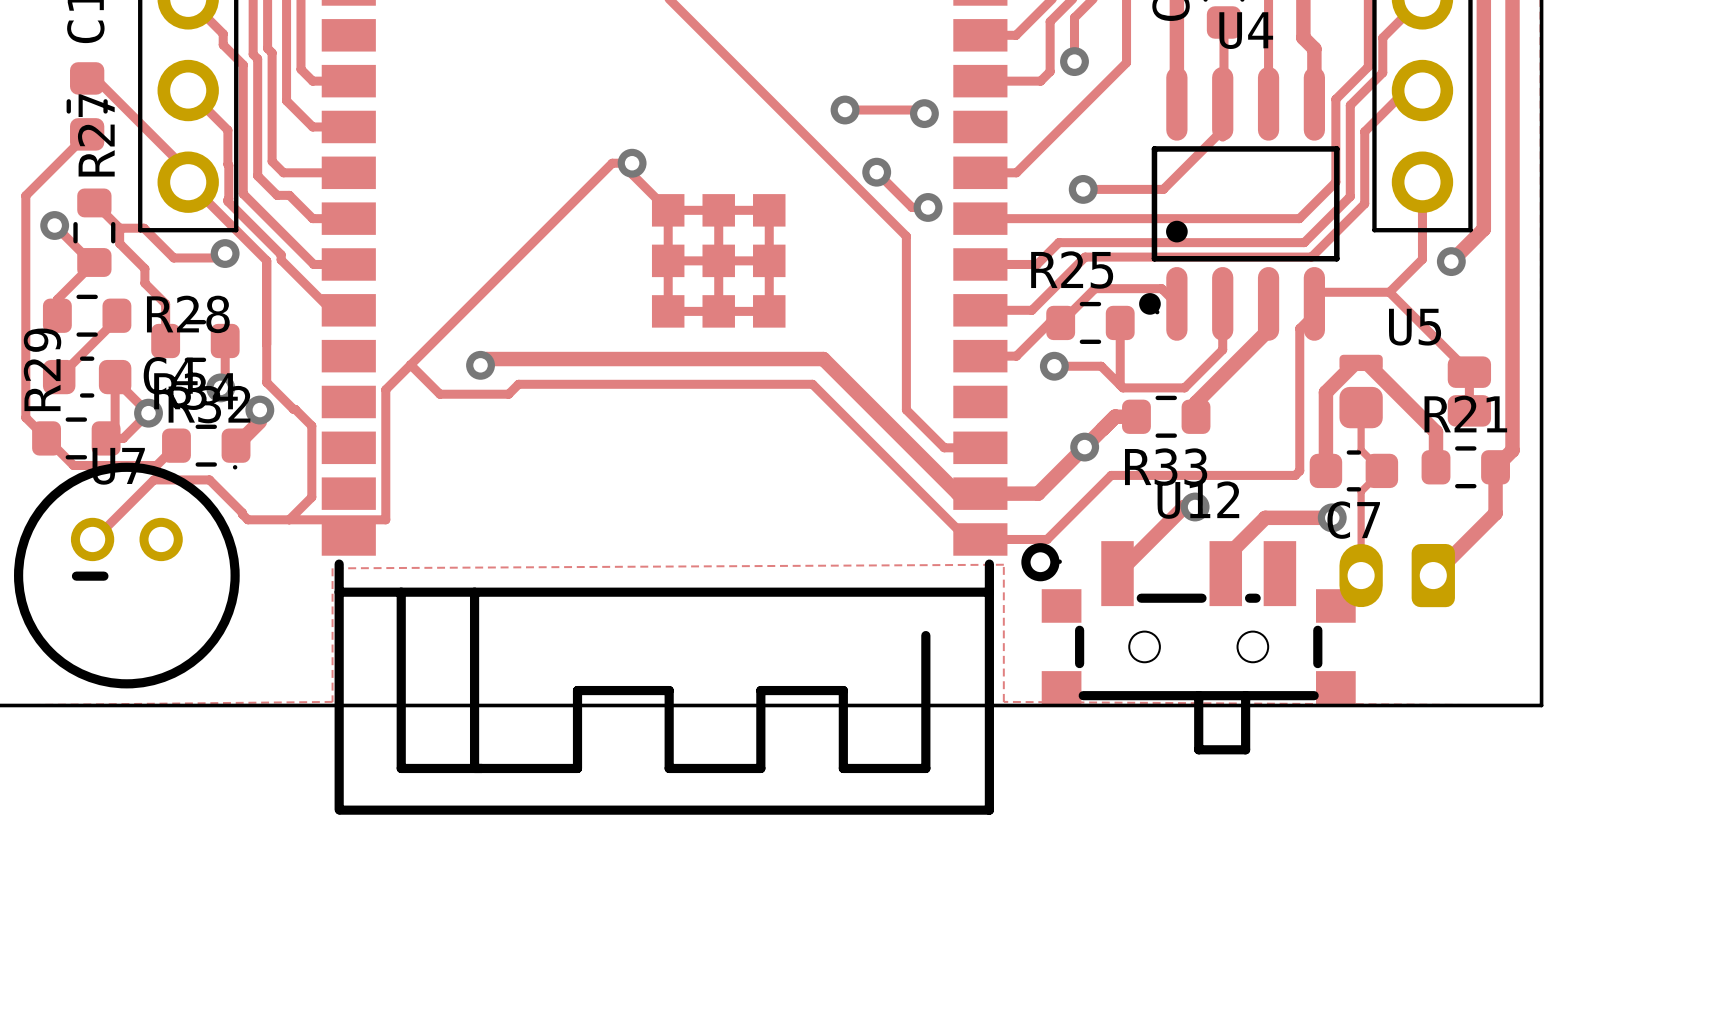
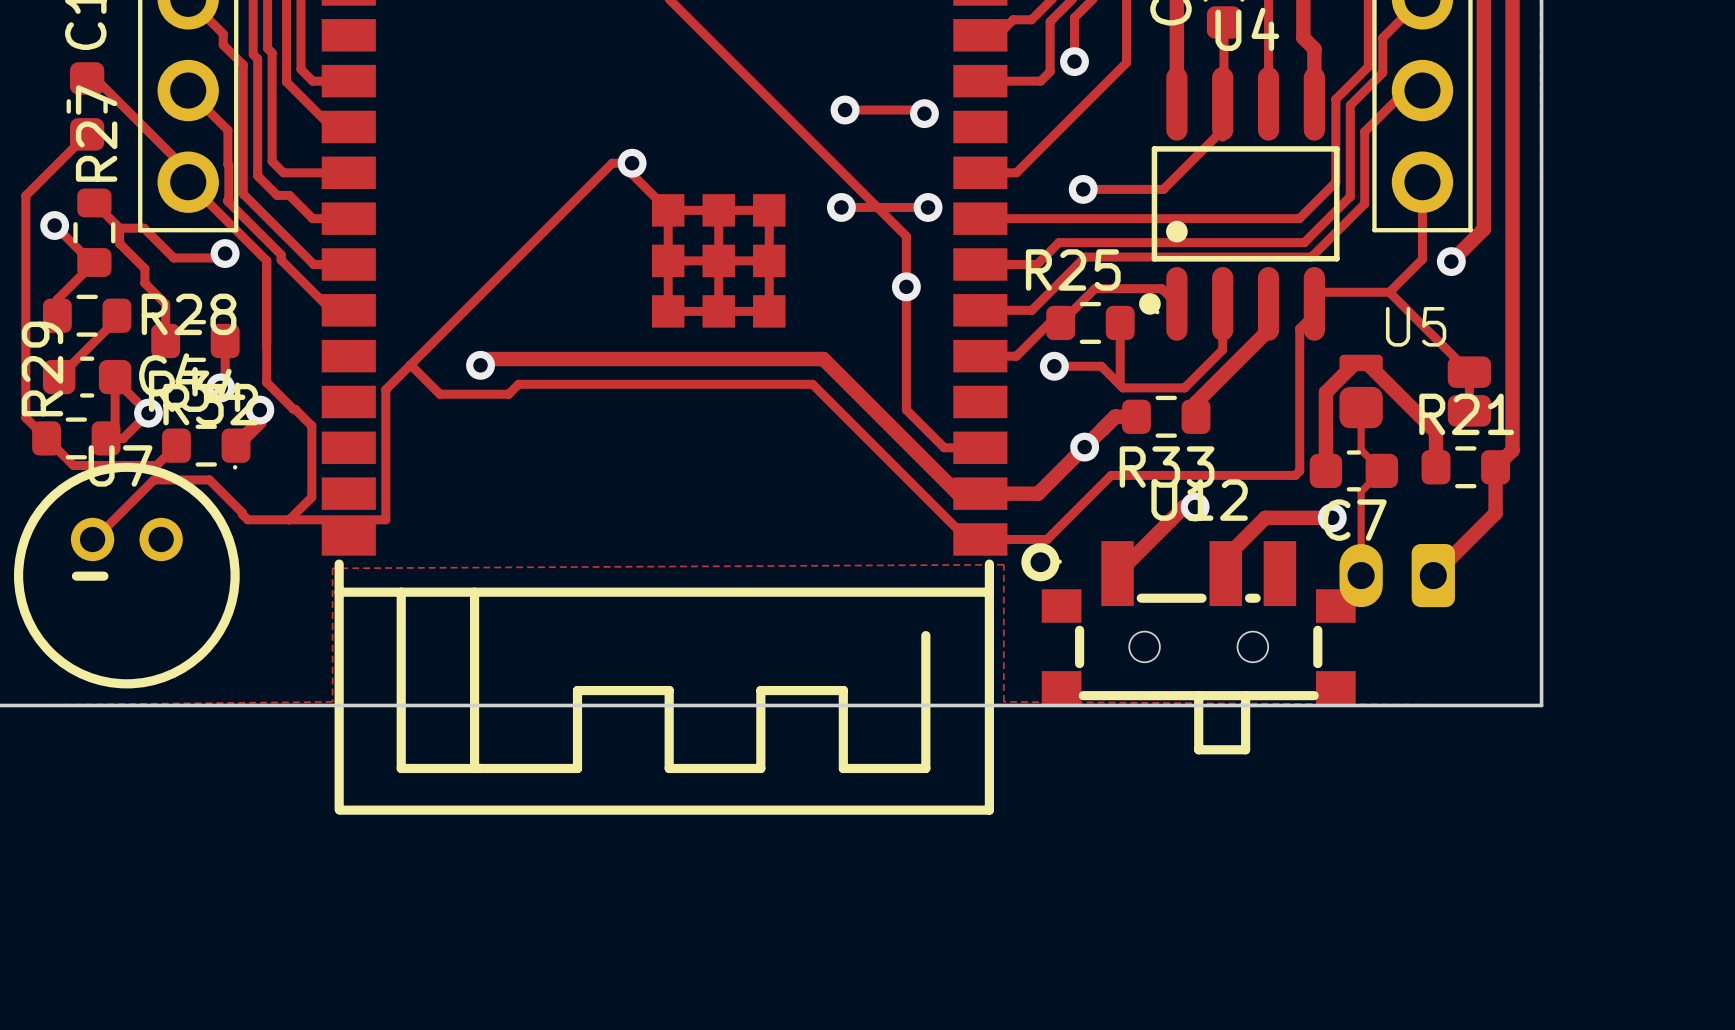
track: (1031, 19) (1016, 35) (997, 35) -> (1031, 19) (1013, 19) (997, 35)
track: (286, 82) (286, 100) (312, 126) (331, 126) -> (286, 82) (331, 126)
track: (876, 172) (911, 207) -> (841, 207) (911, 207)
via position: (876, 172) -> (841, 207)
via: none -> (906, 286)

